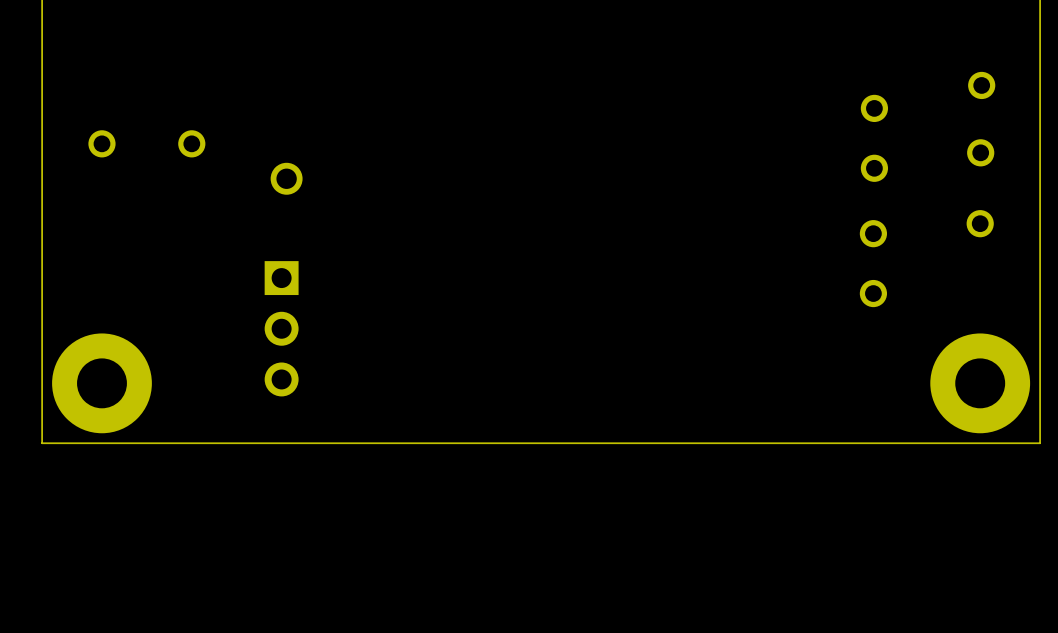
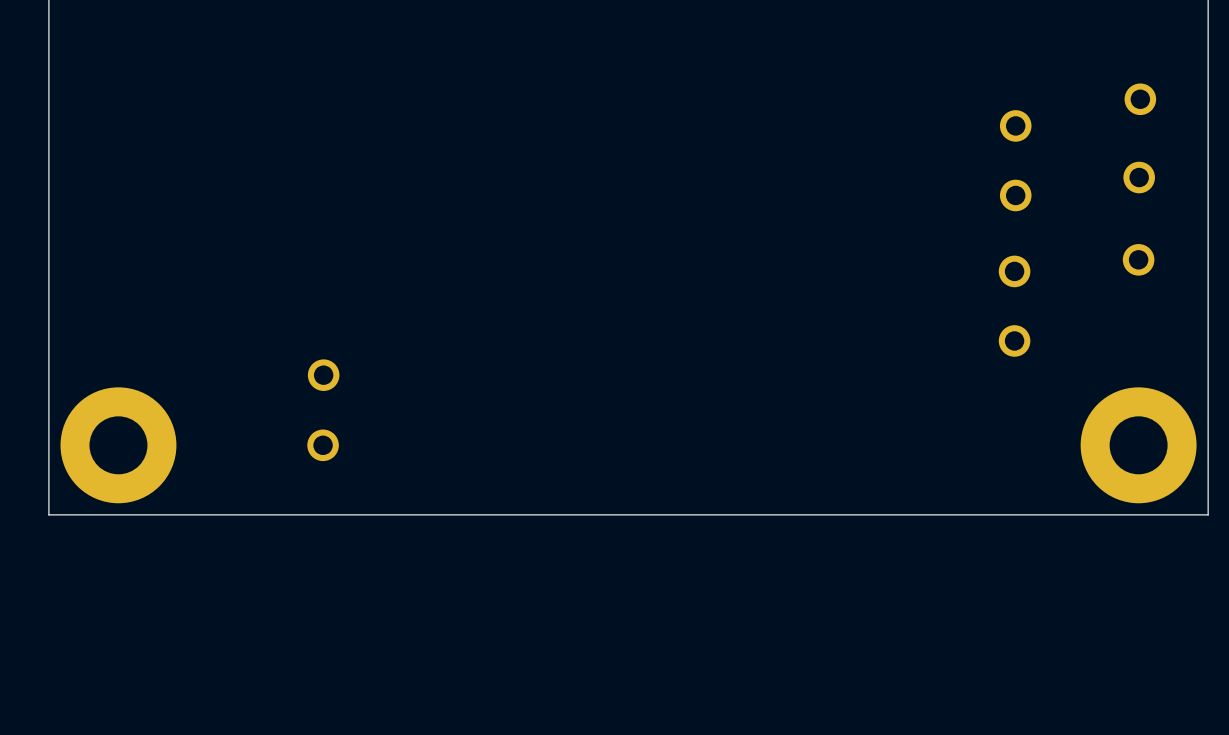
part: (101, 143) -> none
part: (191, 143) -> none
part: (286, 178) -> none
part footprint: [264, 261, 299, 397] -> [307, 359, 340, 391]
part: none -> (323, 445)

